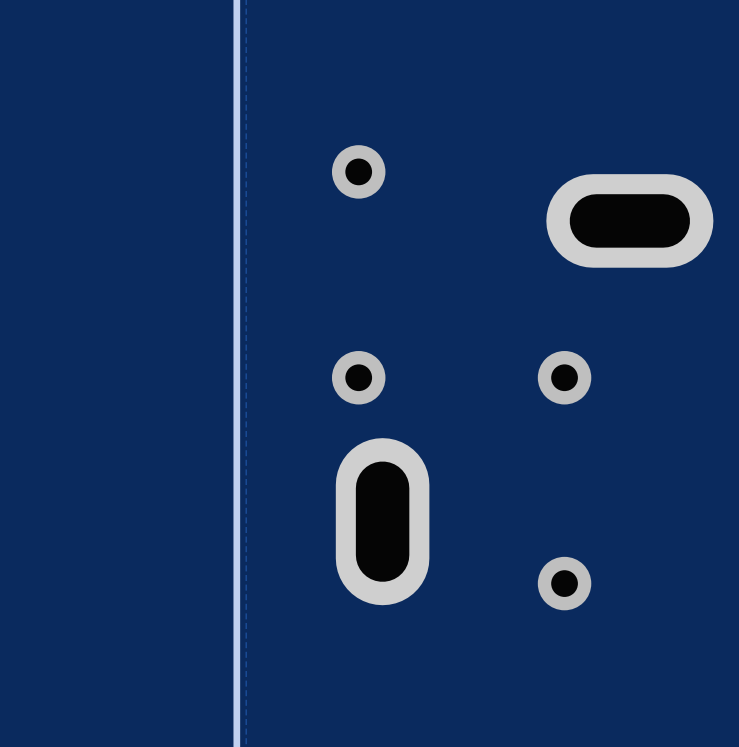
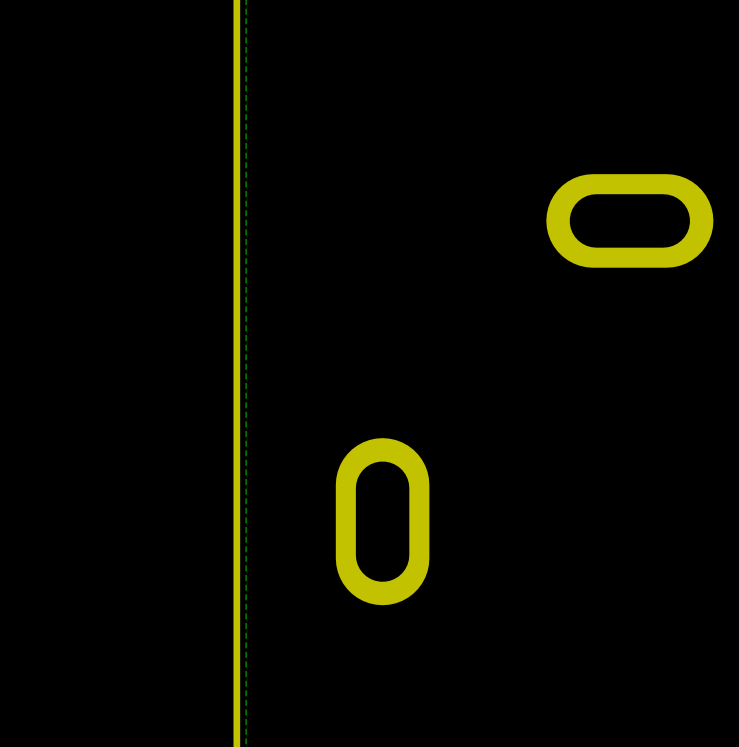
via: (358, 171) -> none
via: (358, 377) -> none
via: (564, 377) -> none
via: (564, 583) -> none

